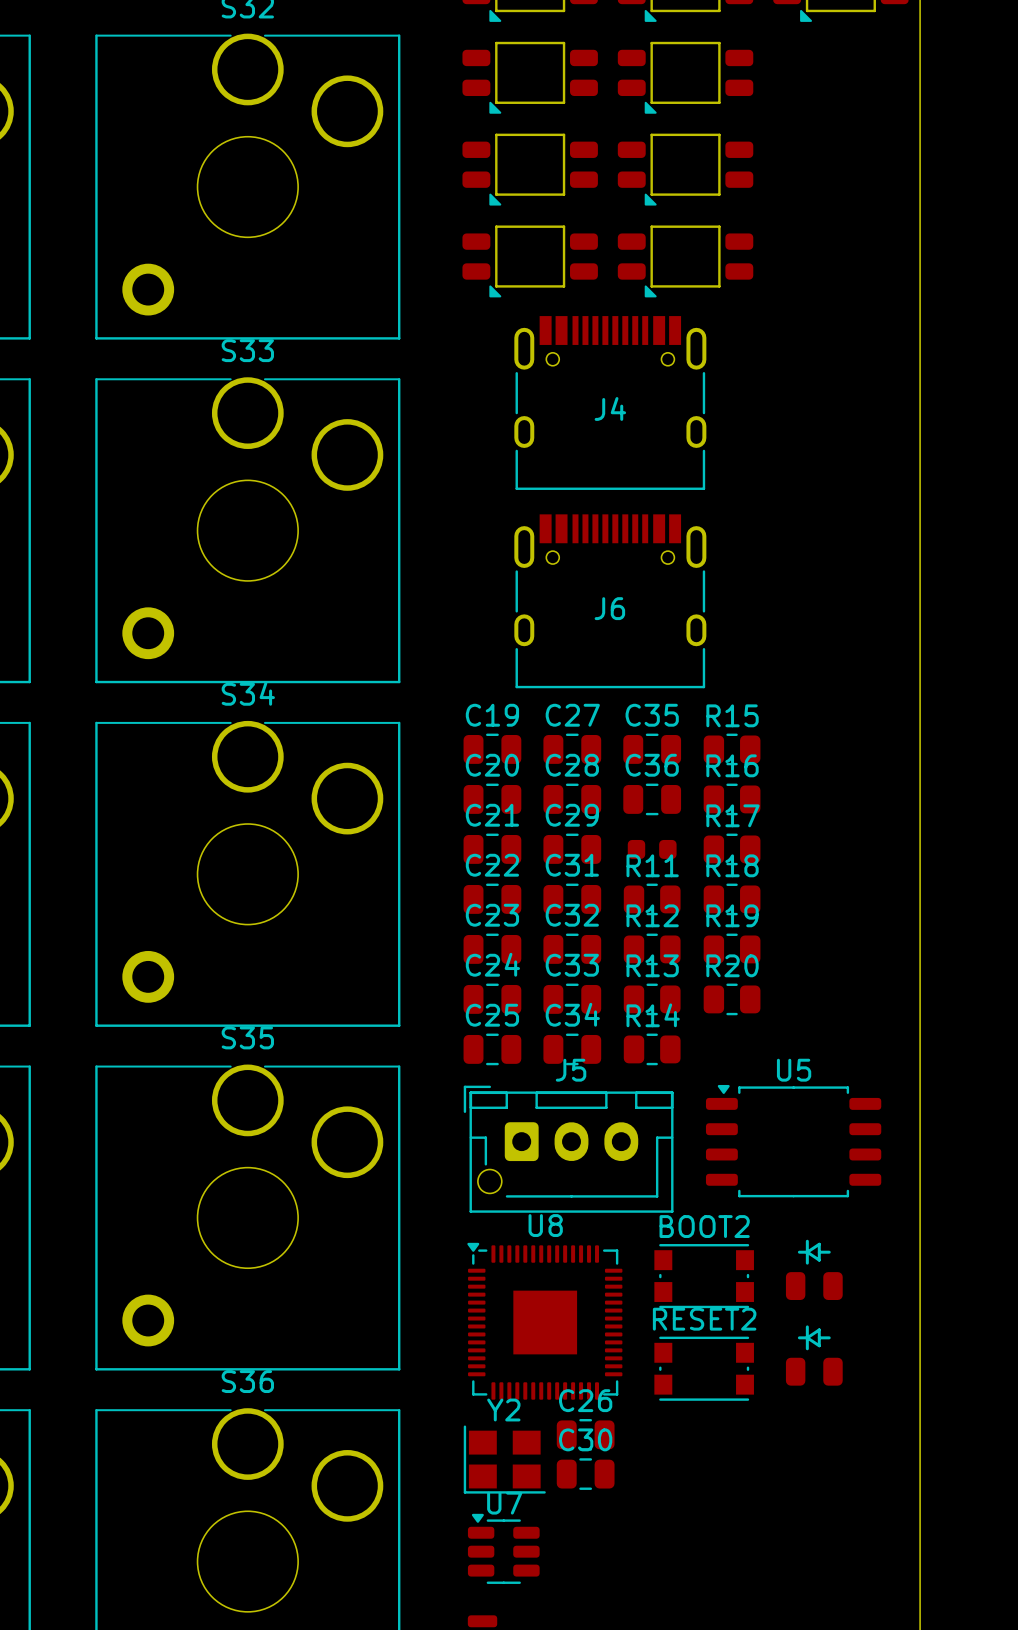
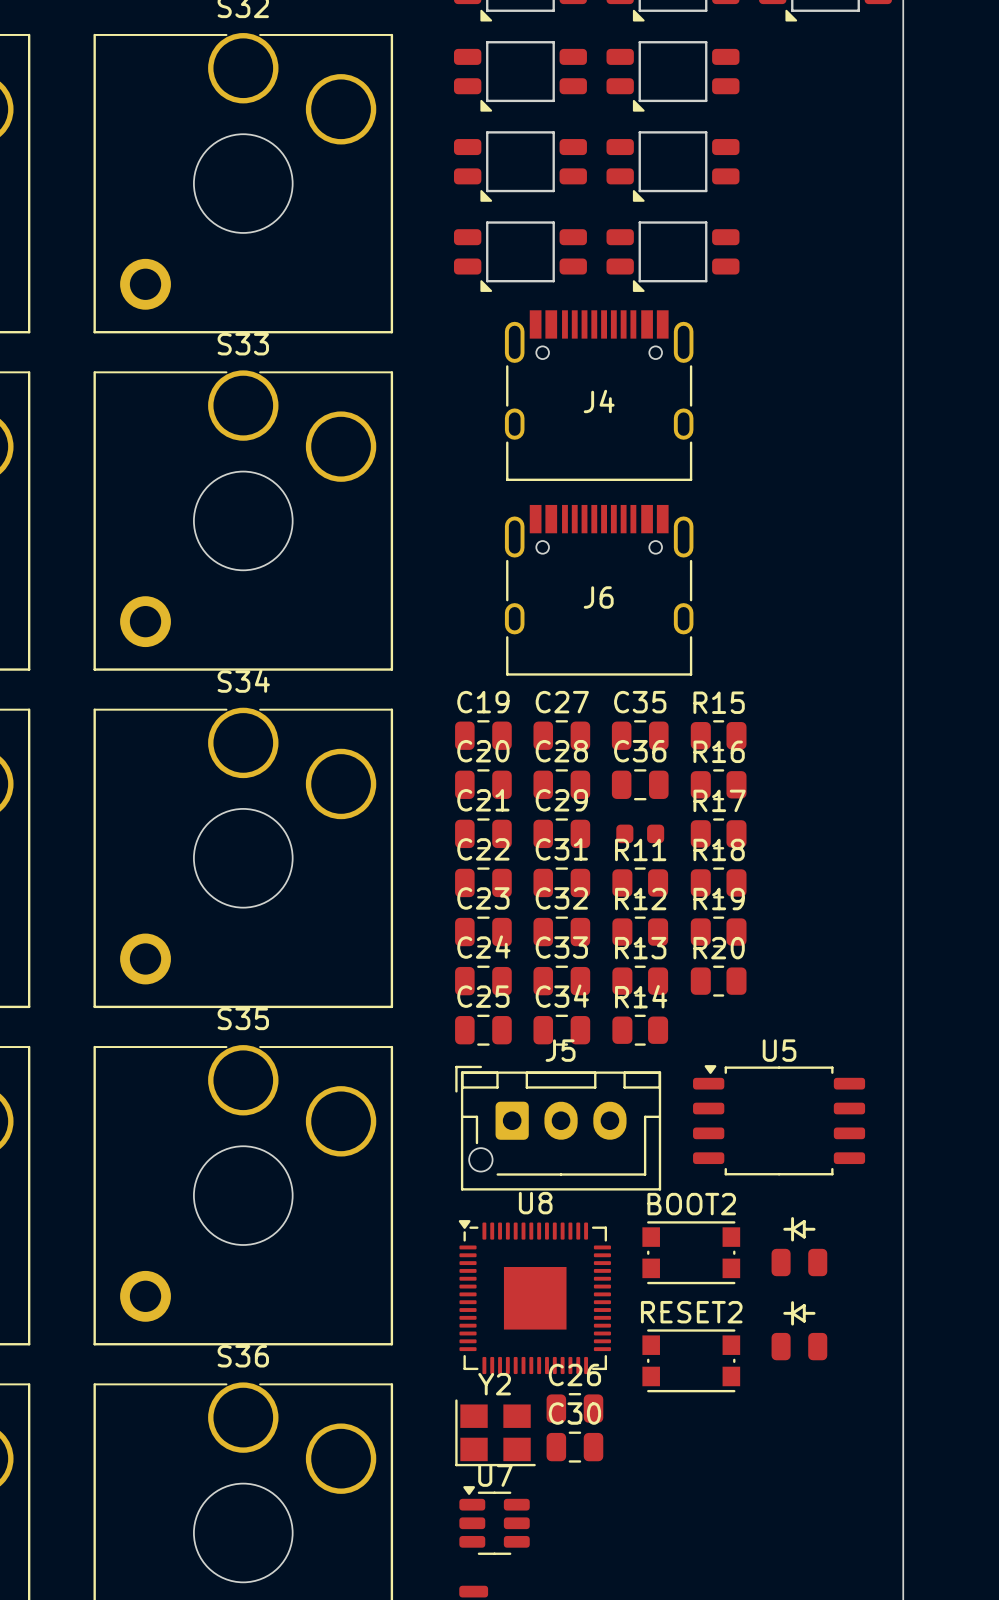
RESET2 position: (704, 1368) -> (691, 1360)

